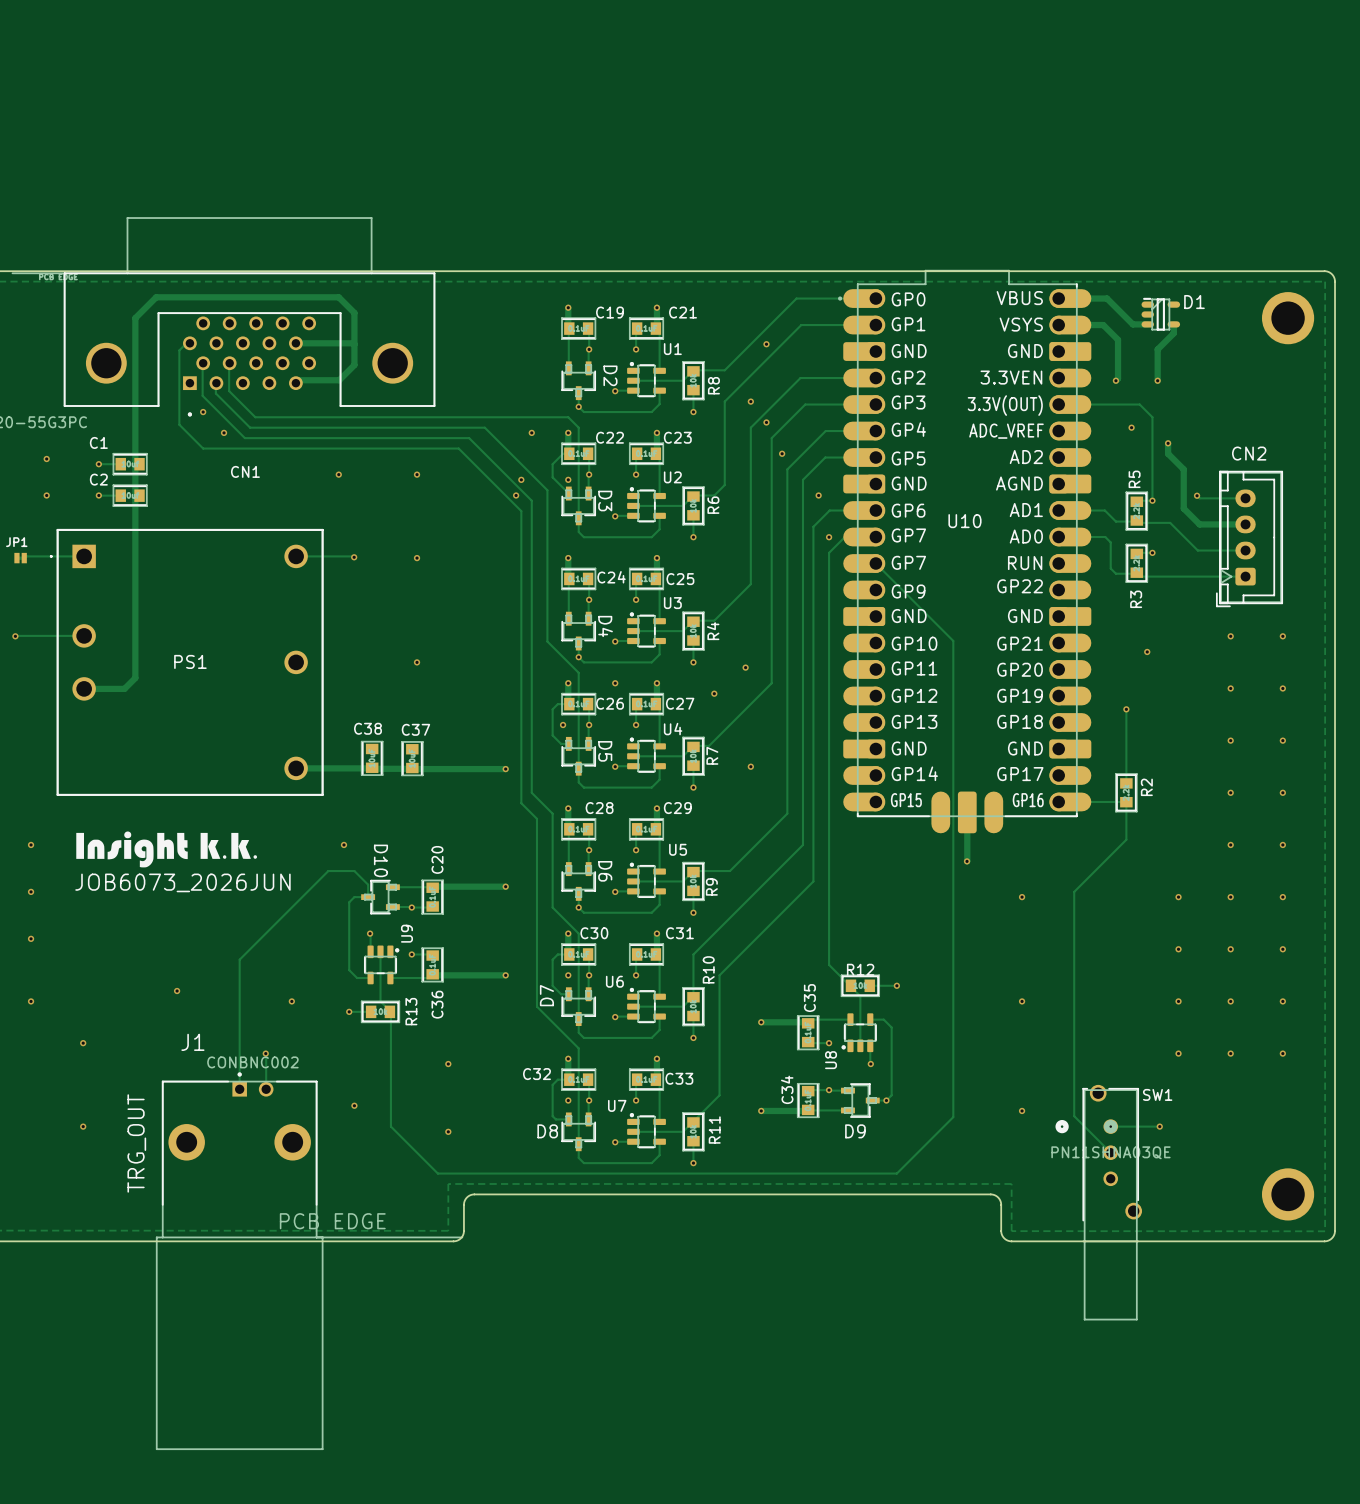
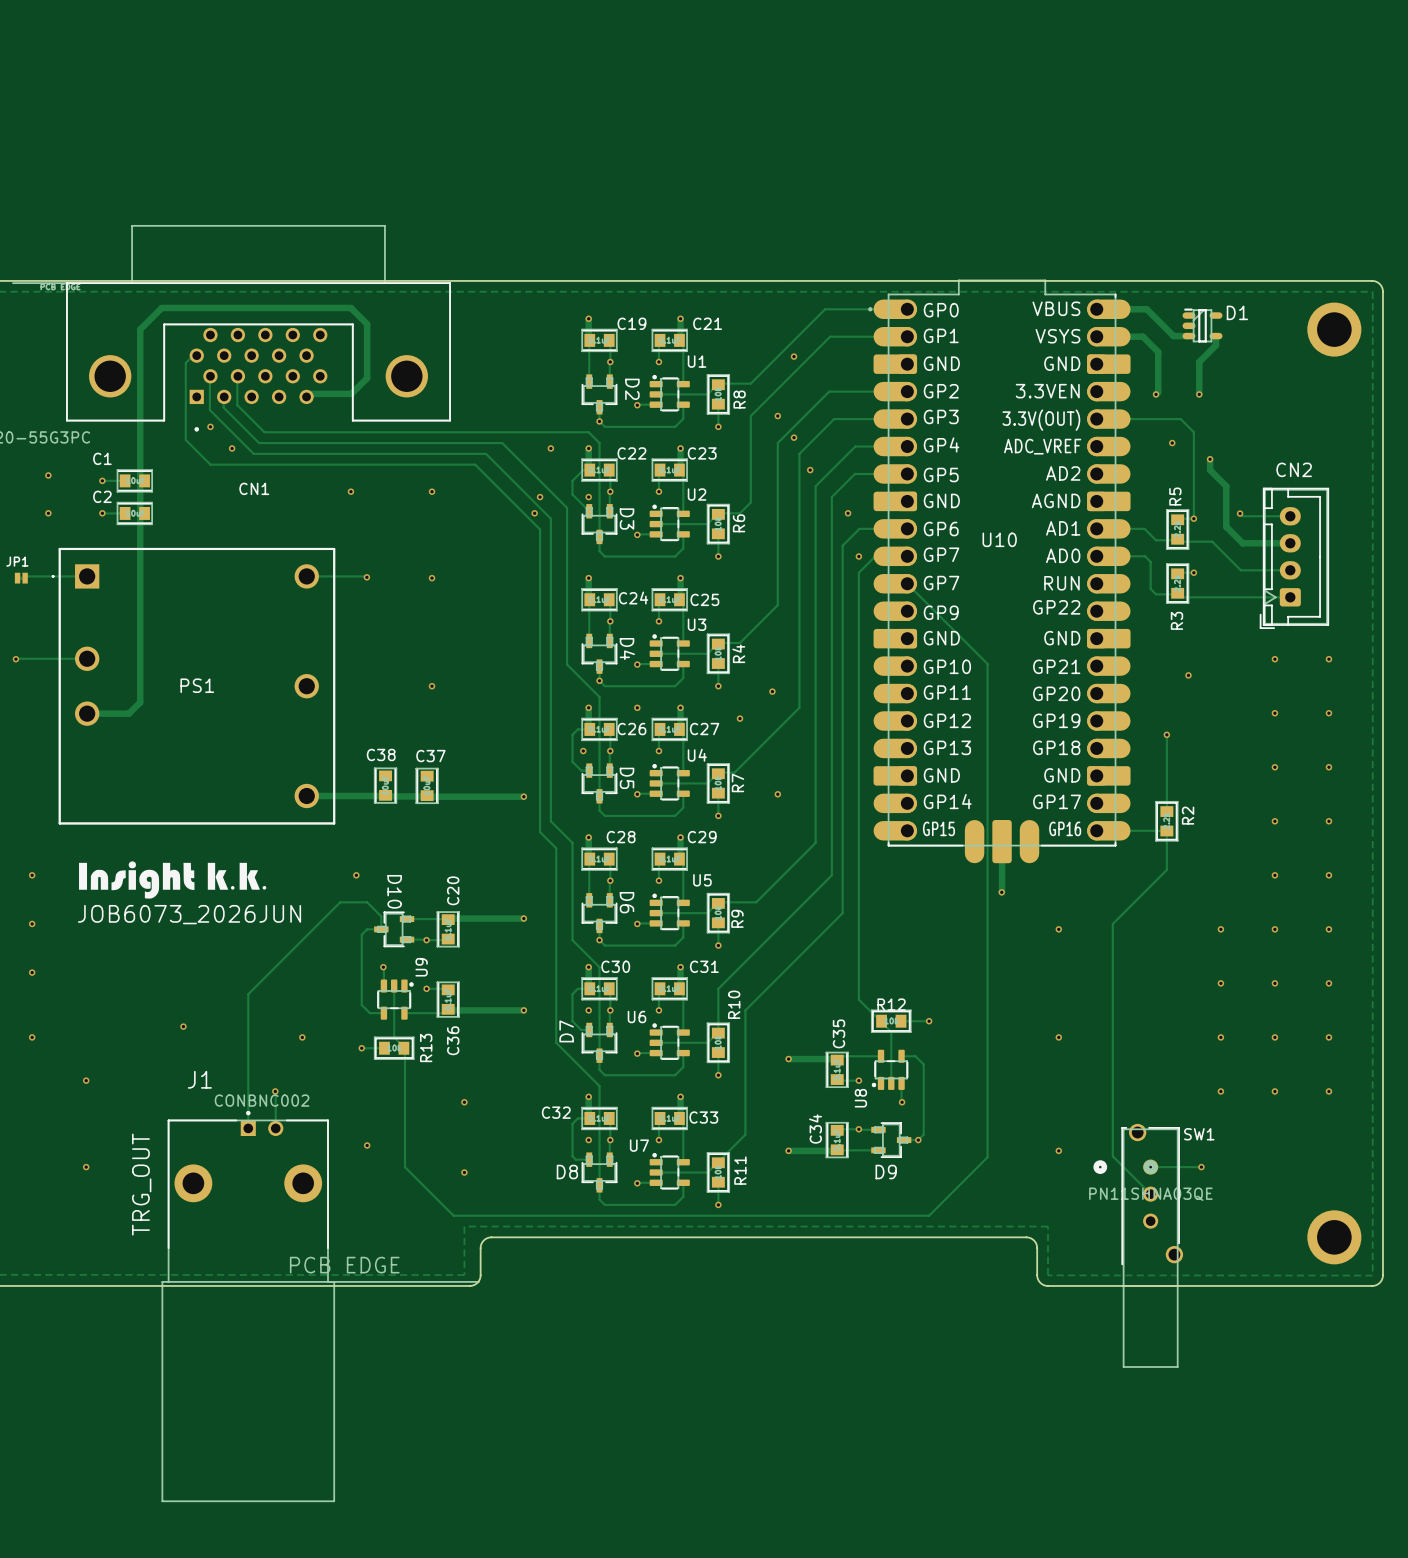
track: (295, 343) (354, 344) -> none

